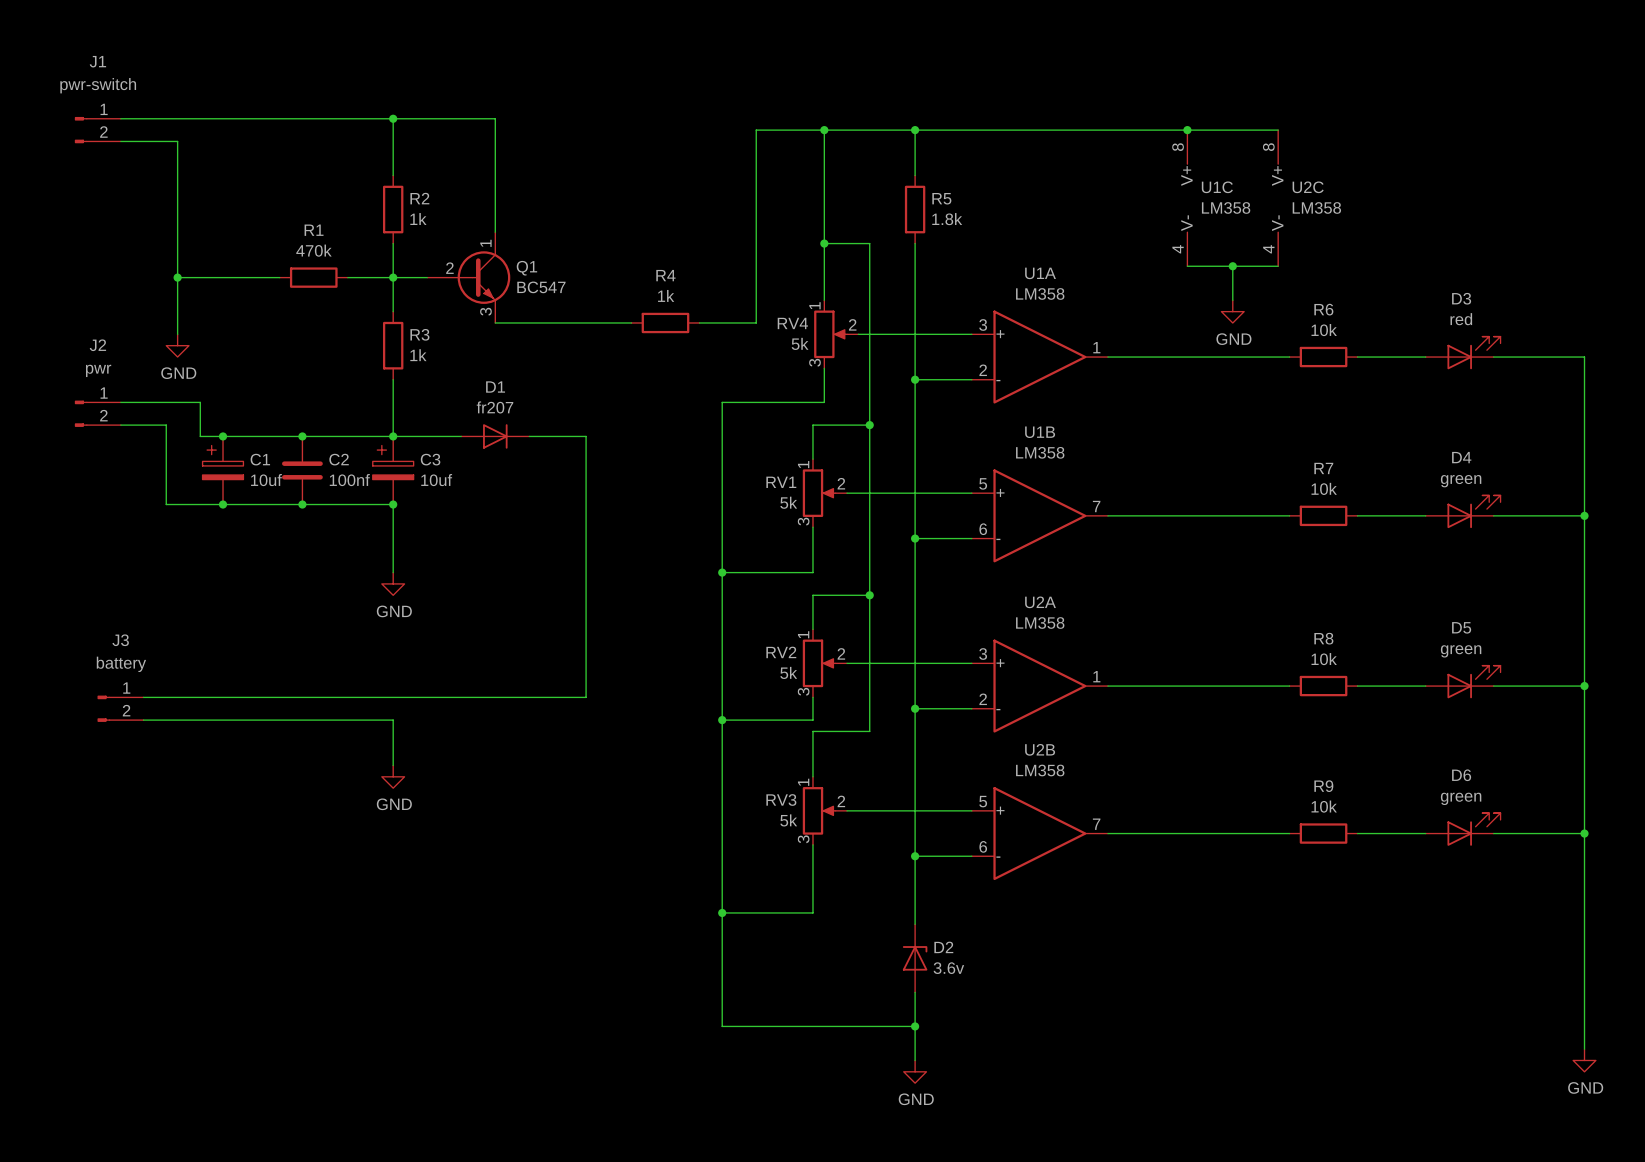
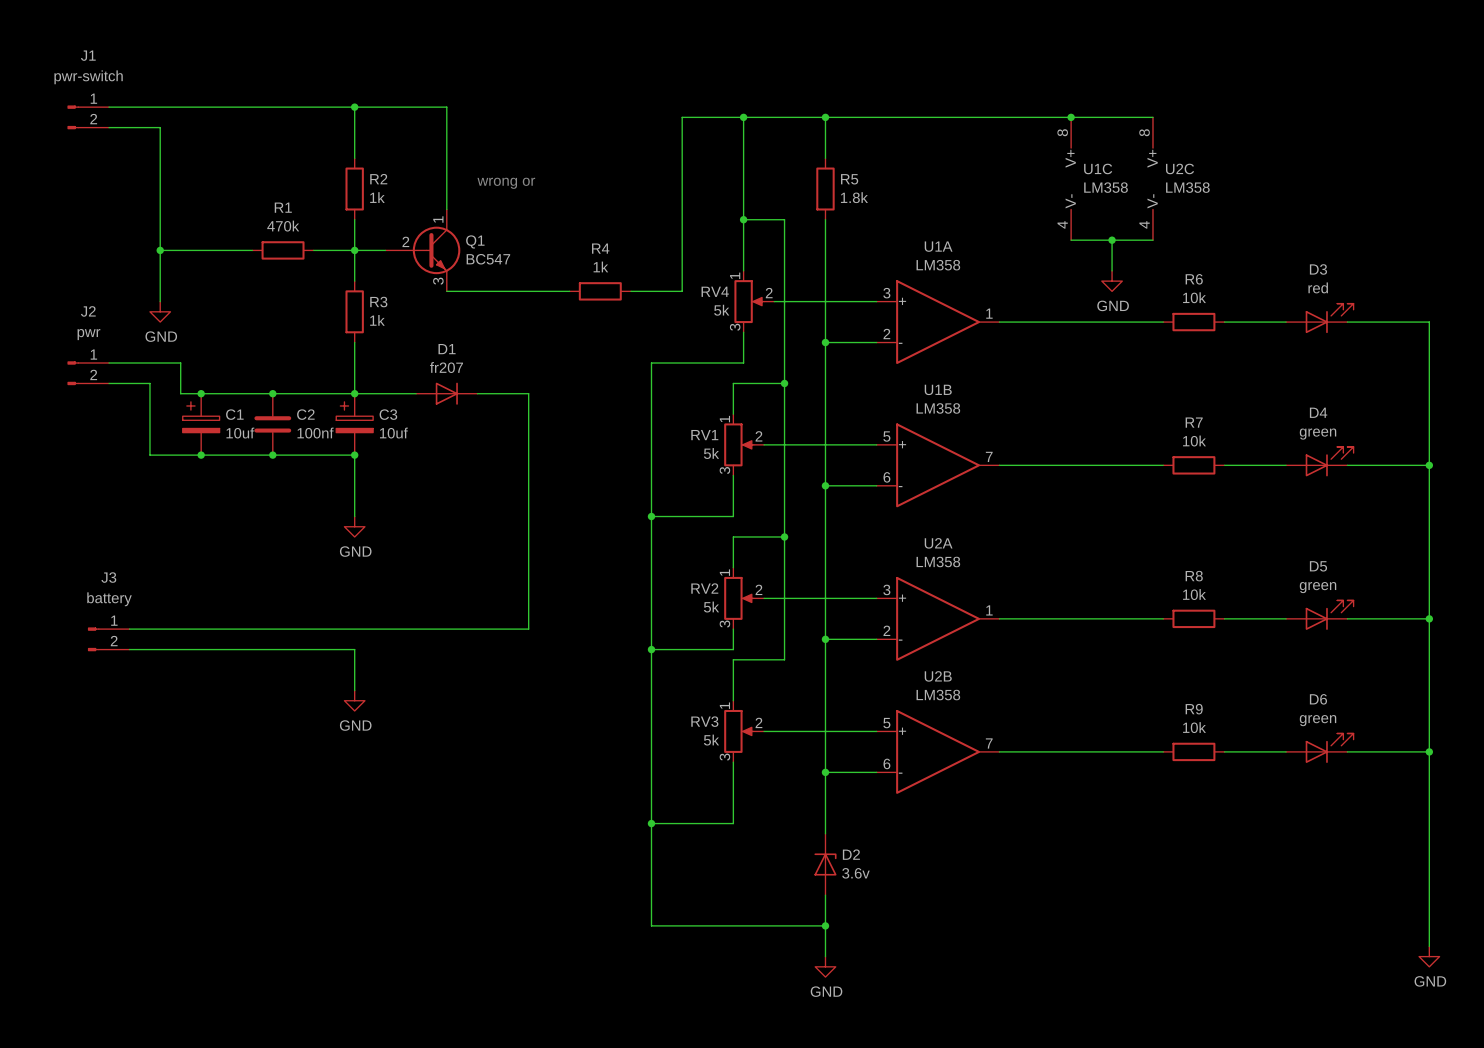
text: none -> wrong or (506, 183)

